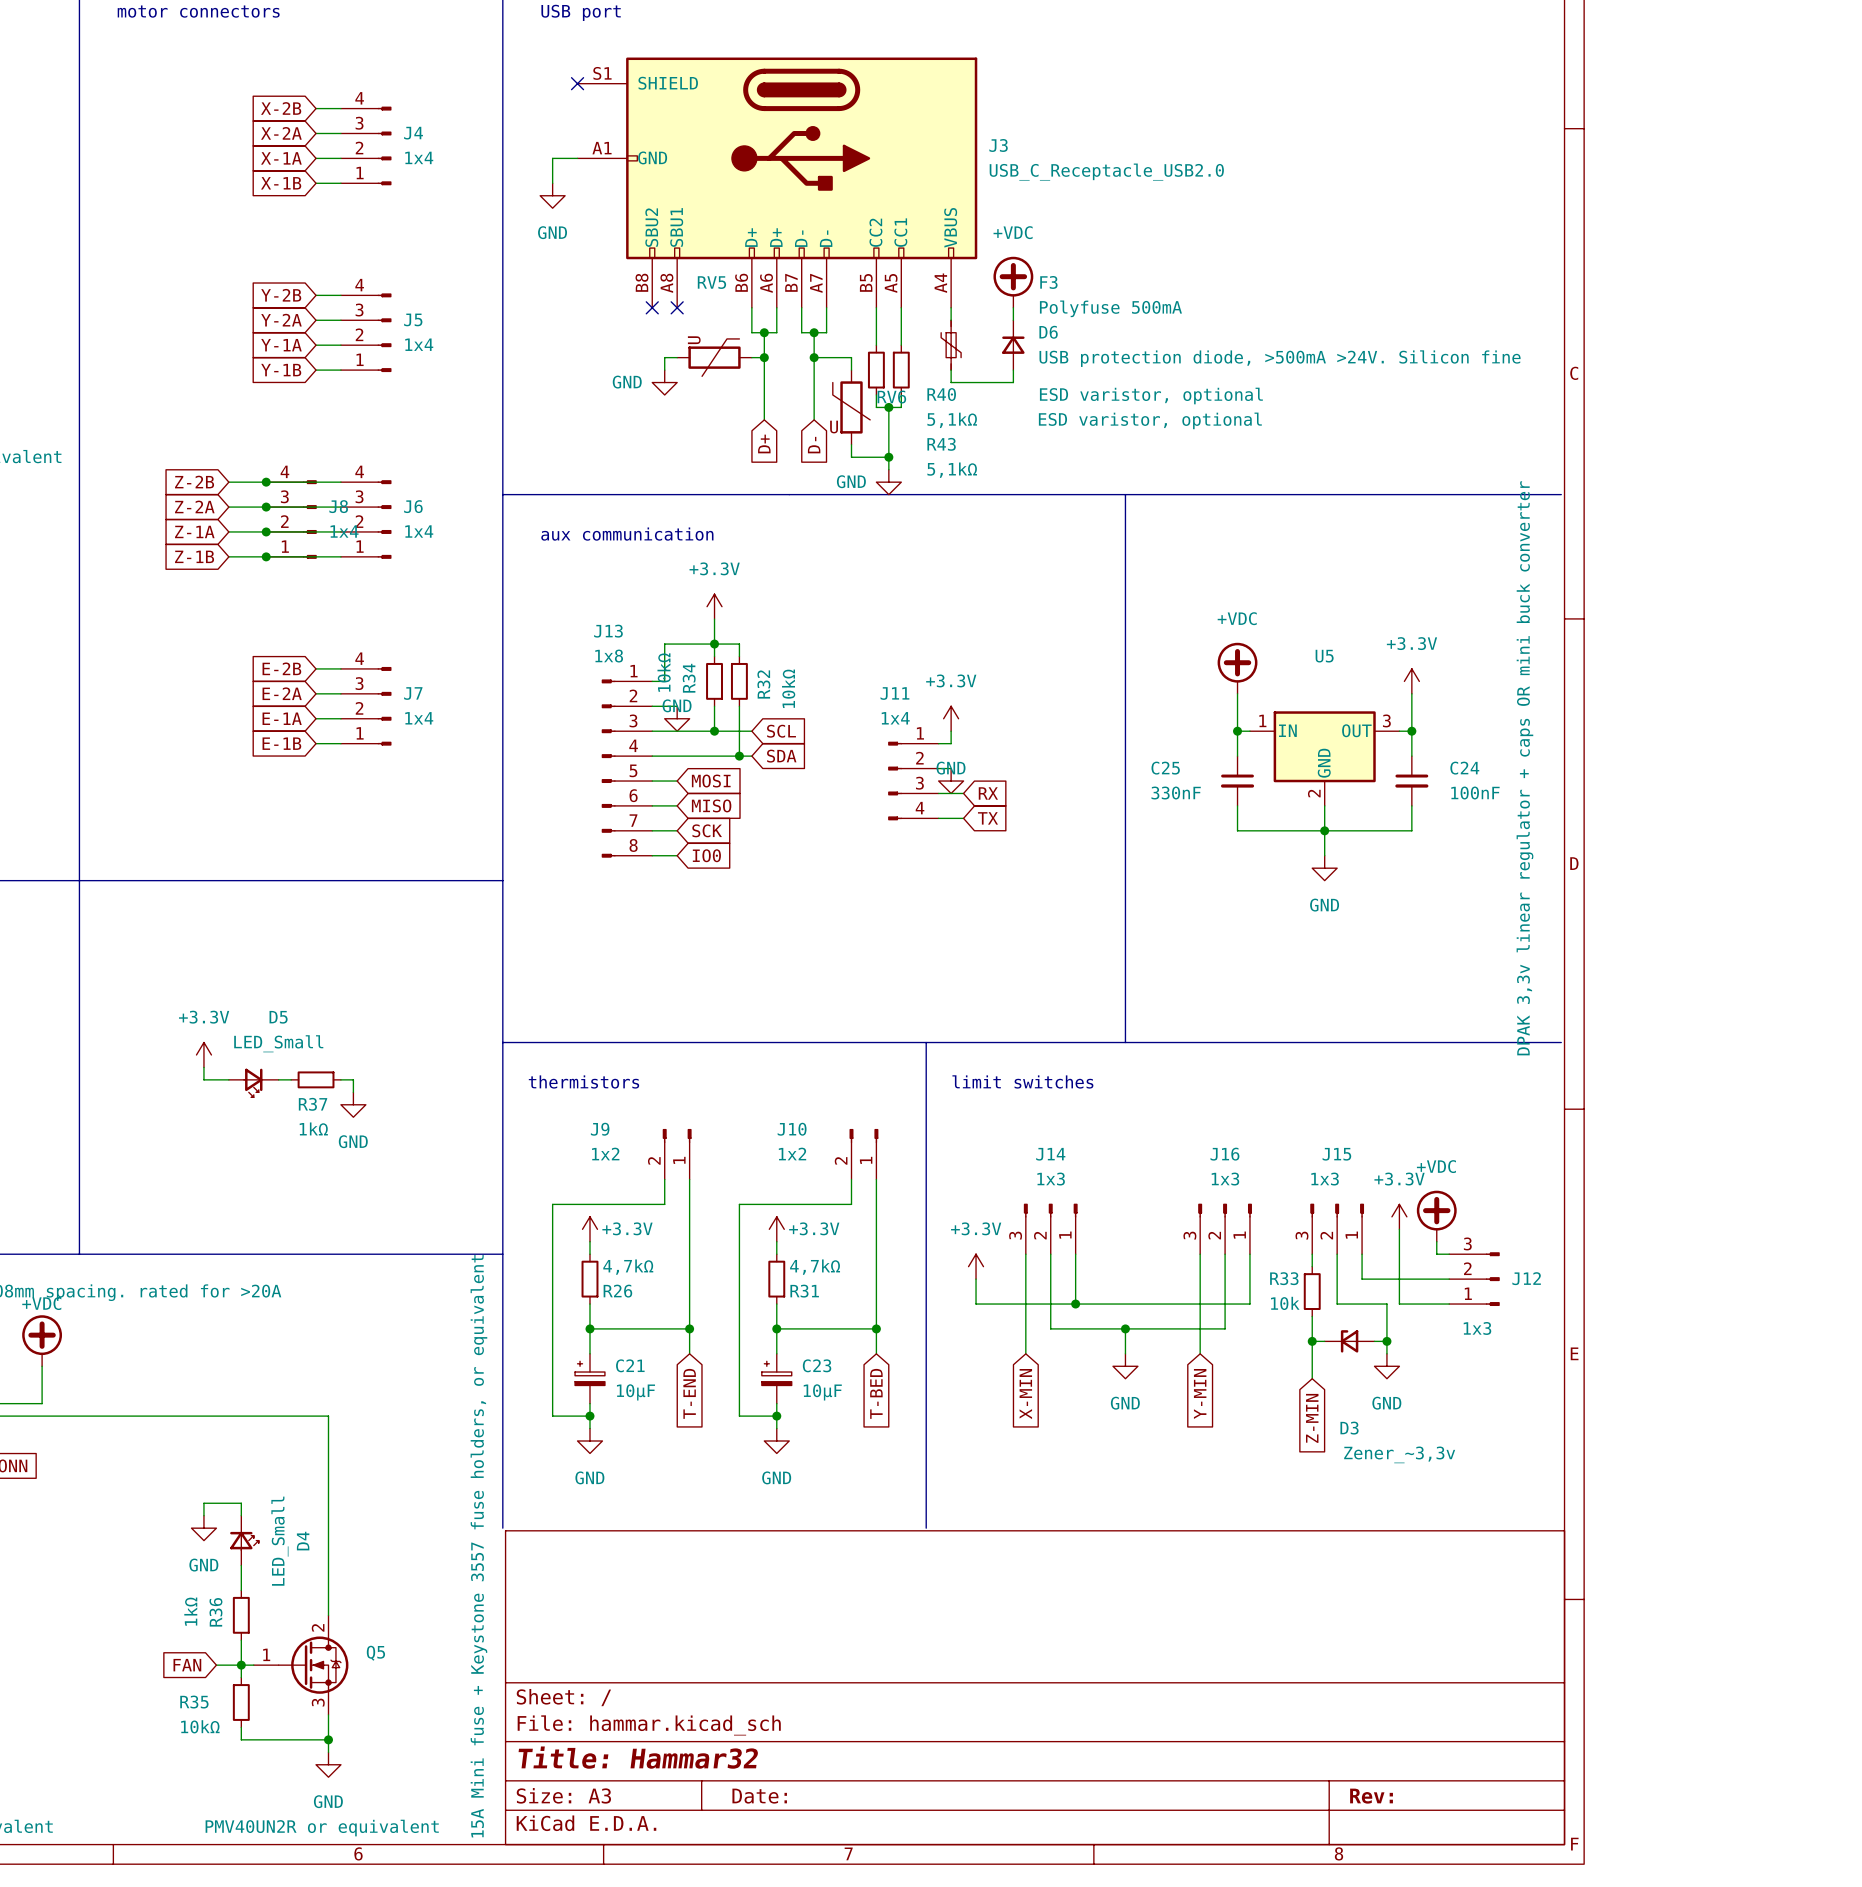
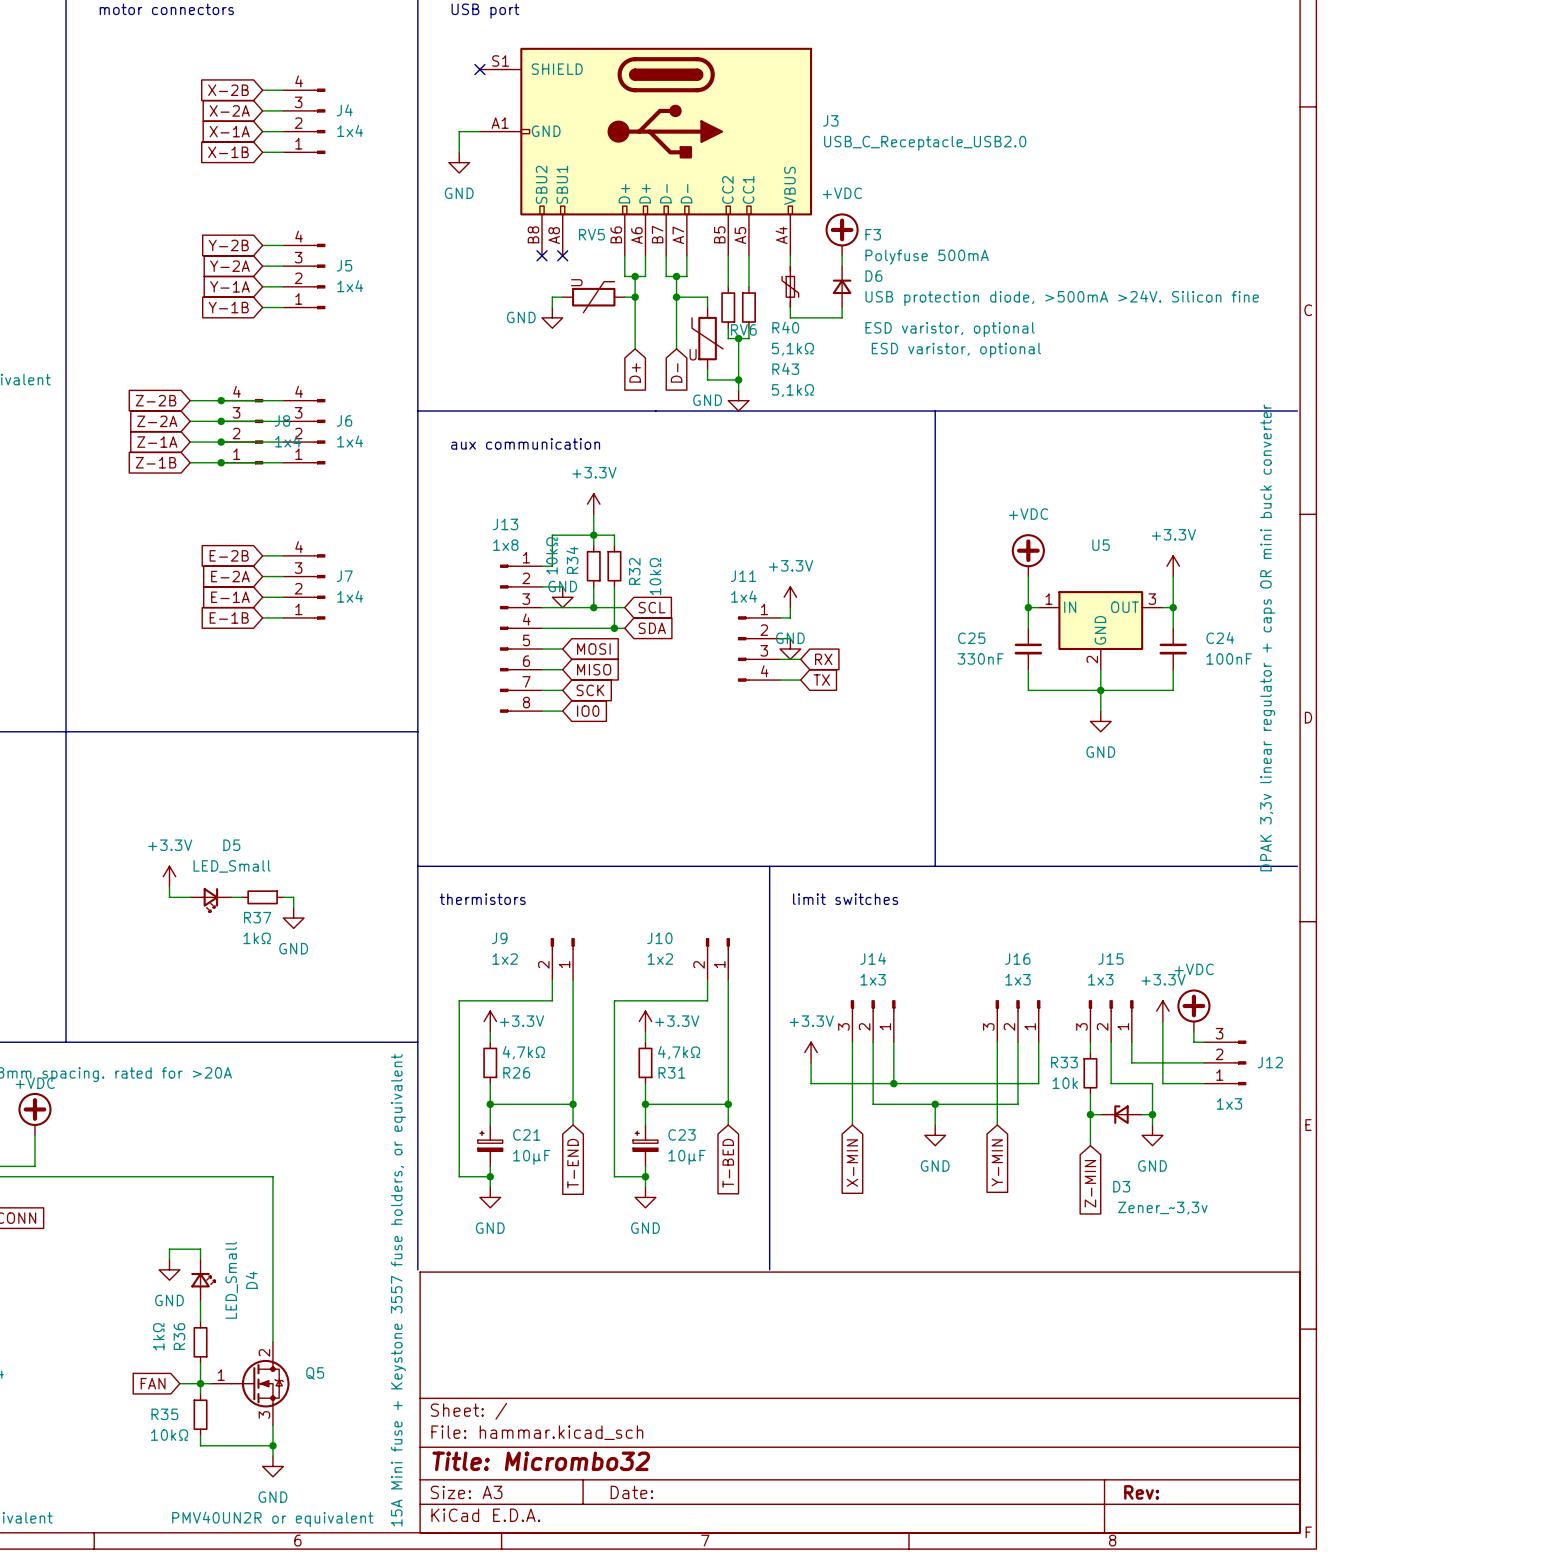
title block: Title: Hammar32 (638, 1757) -> Title: Micrombo32 (541, 1461)

